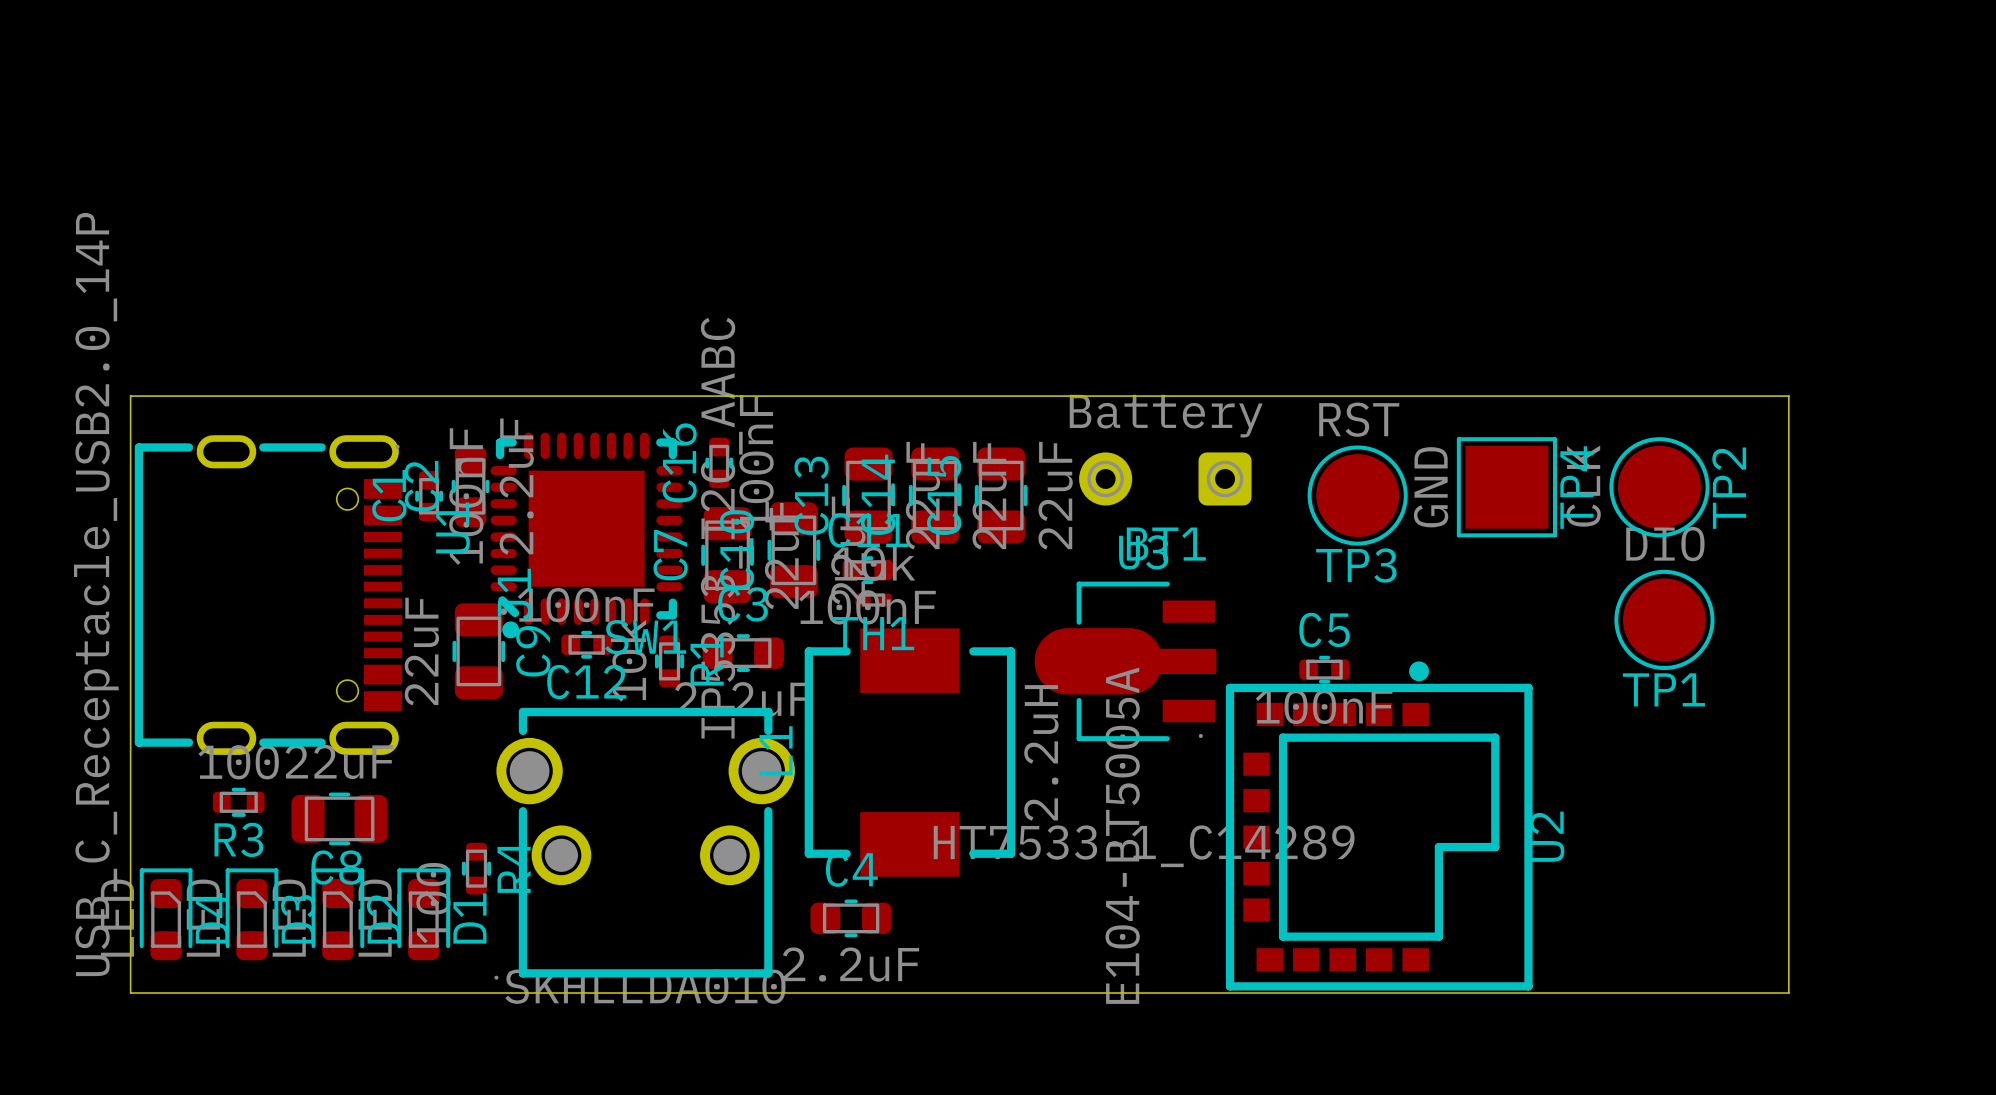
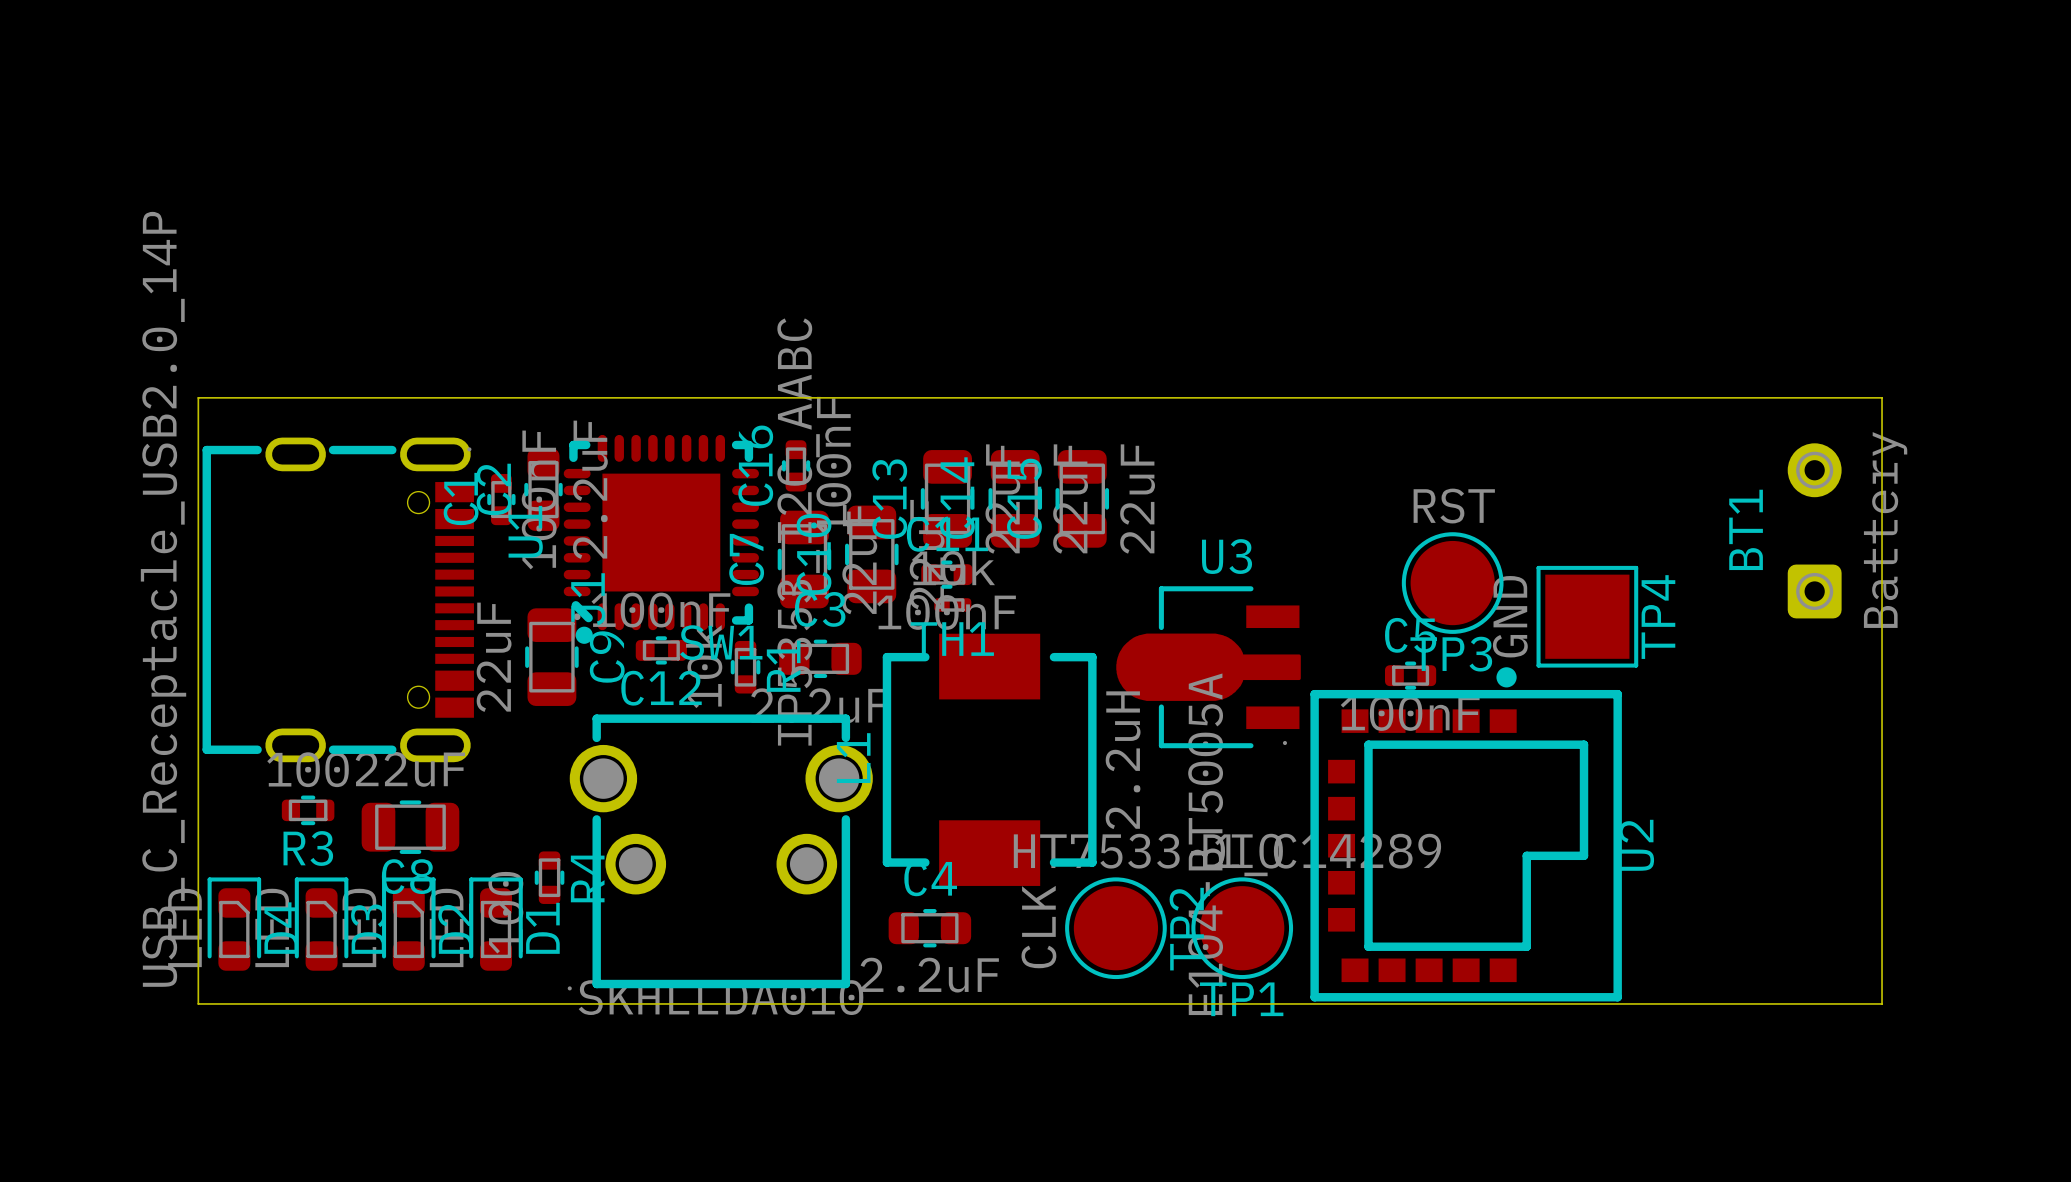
BT1 rotation: 0° (1165, 478) -> 90° clockwise (1814, 530)
BT1 position: (1165, 478) -> (1814, 530)
TP4 position: (1506, 487) -> (1587, 616)
TP2 position: (1659, 487) -> (1115, 928)
TP3 position: (1357, 495) -> (1452, 583)
TP1 position: (1664, 619) -> (1242, 928)

